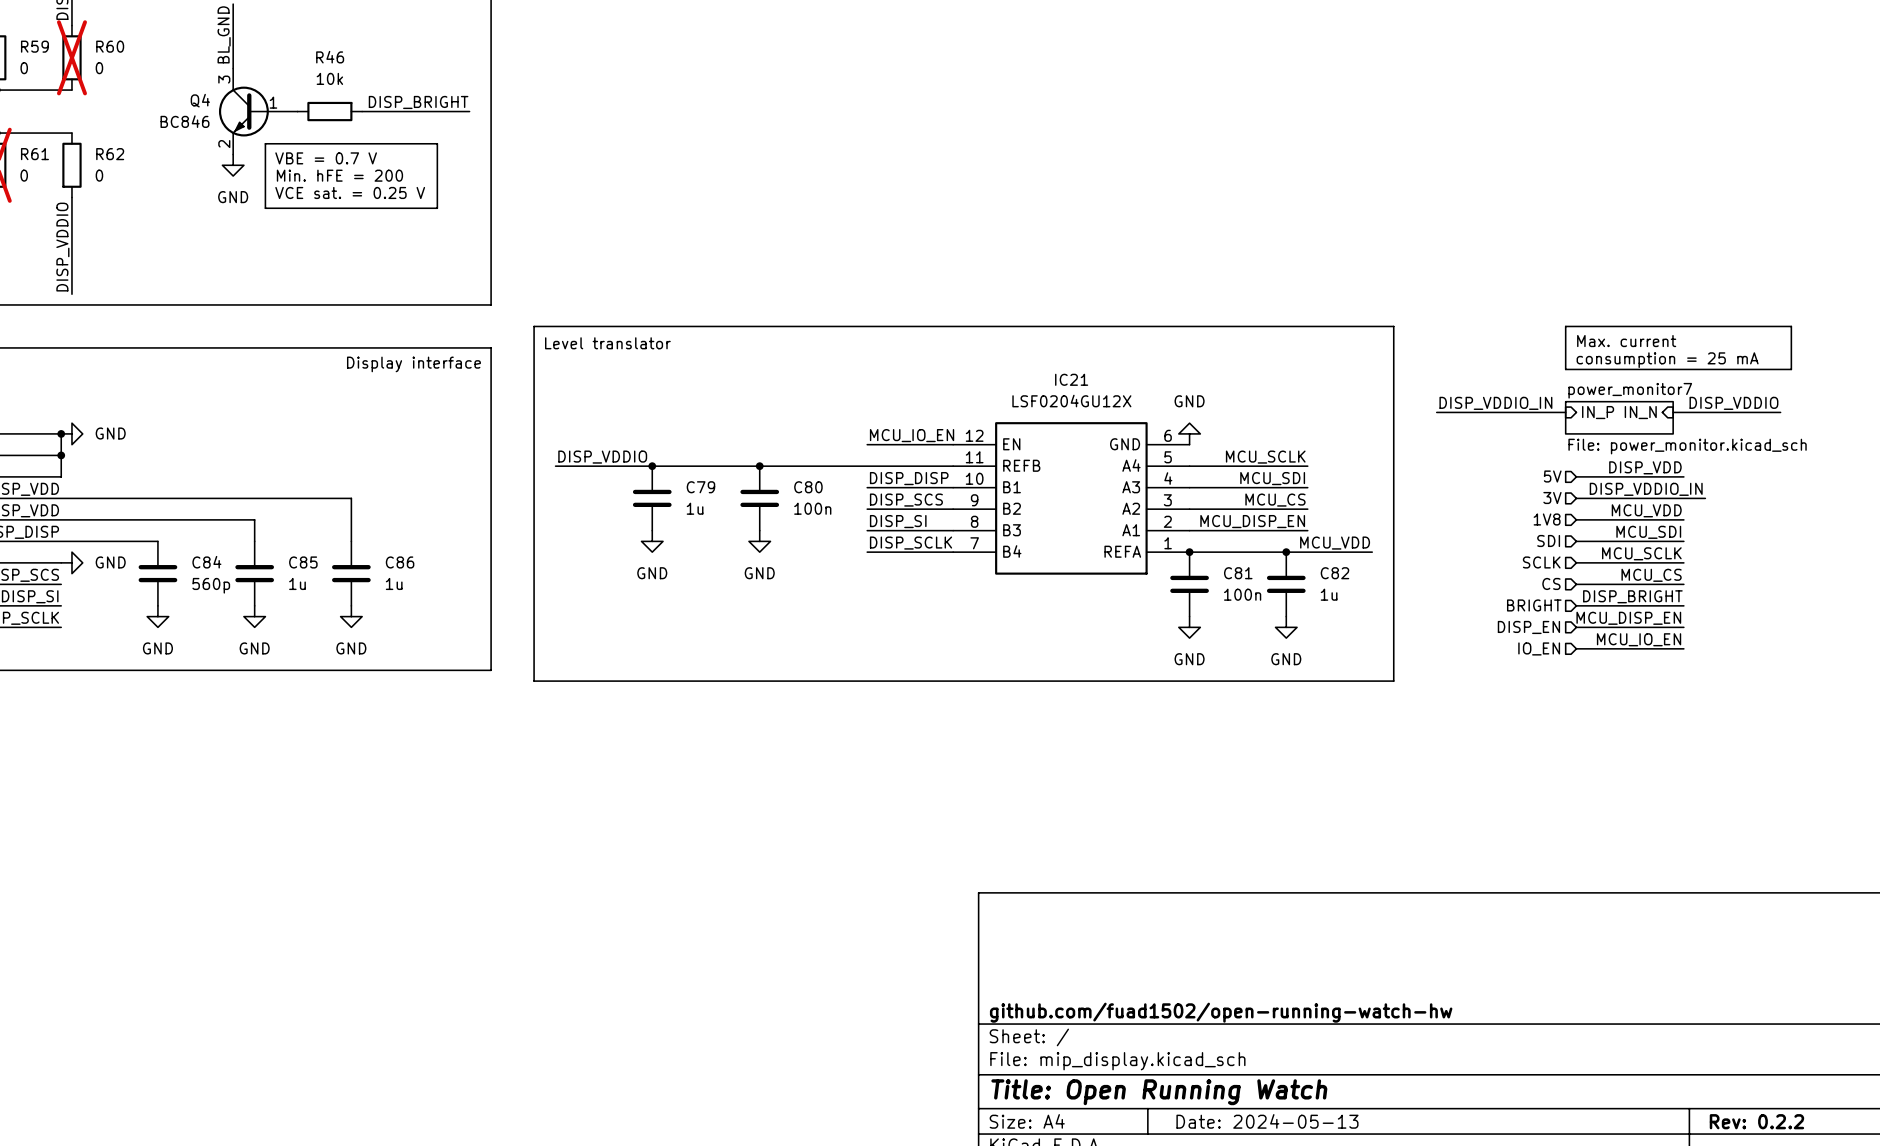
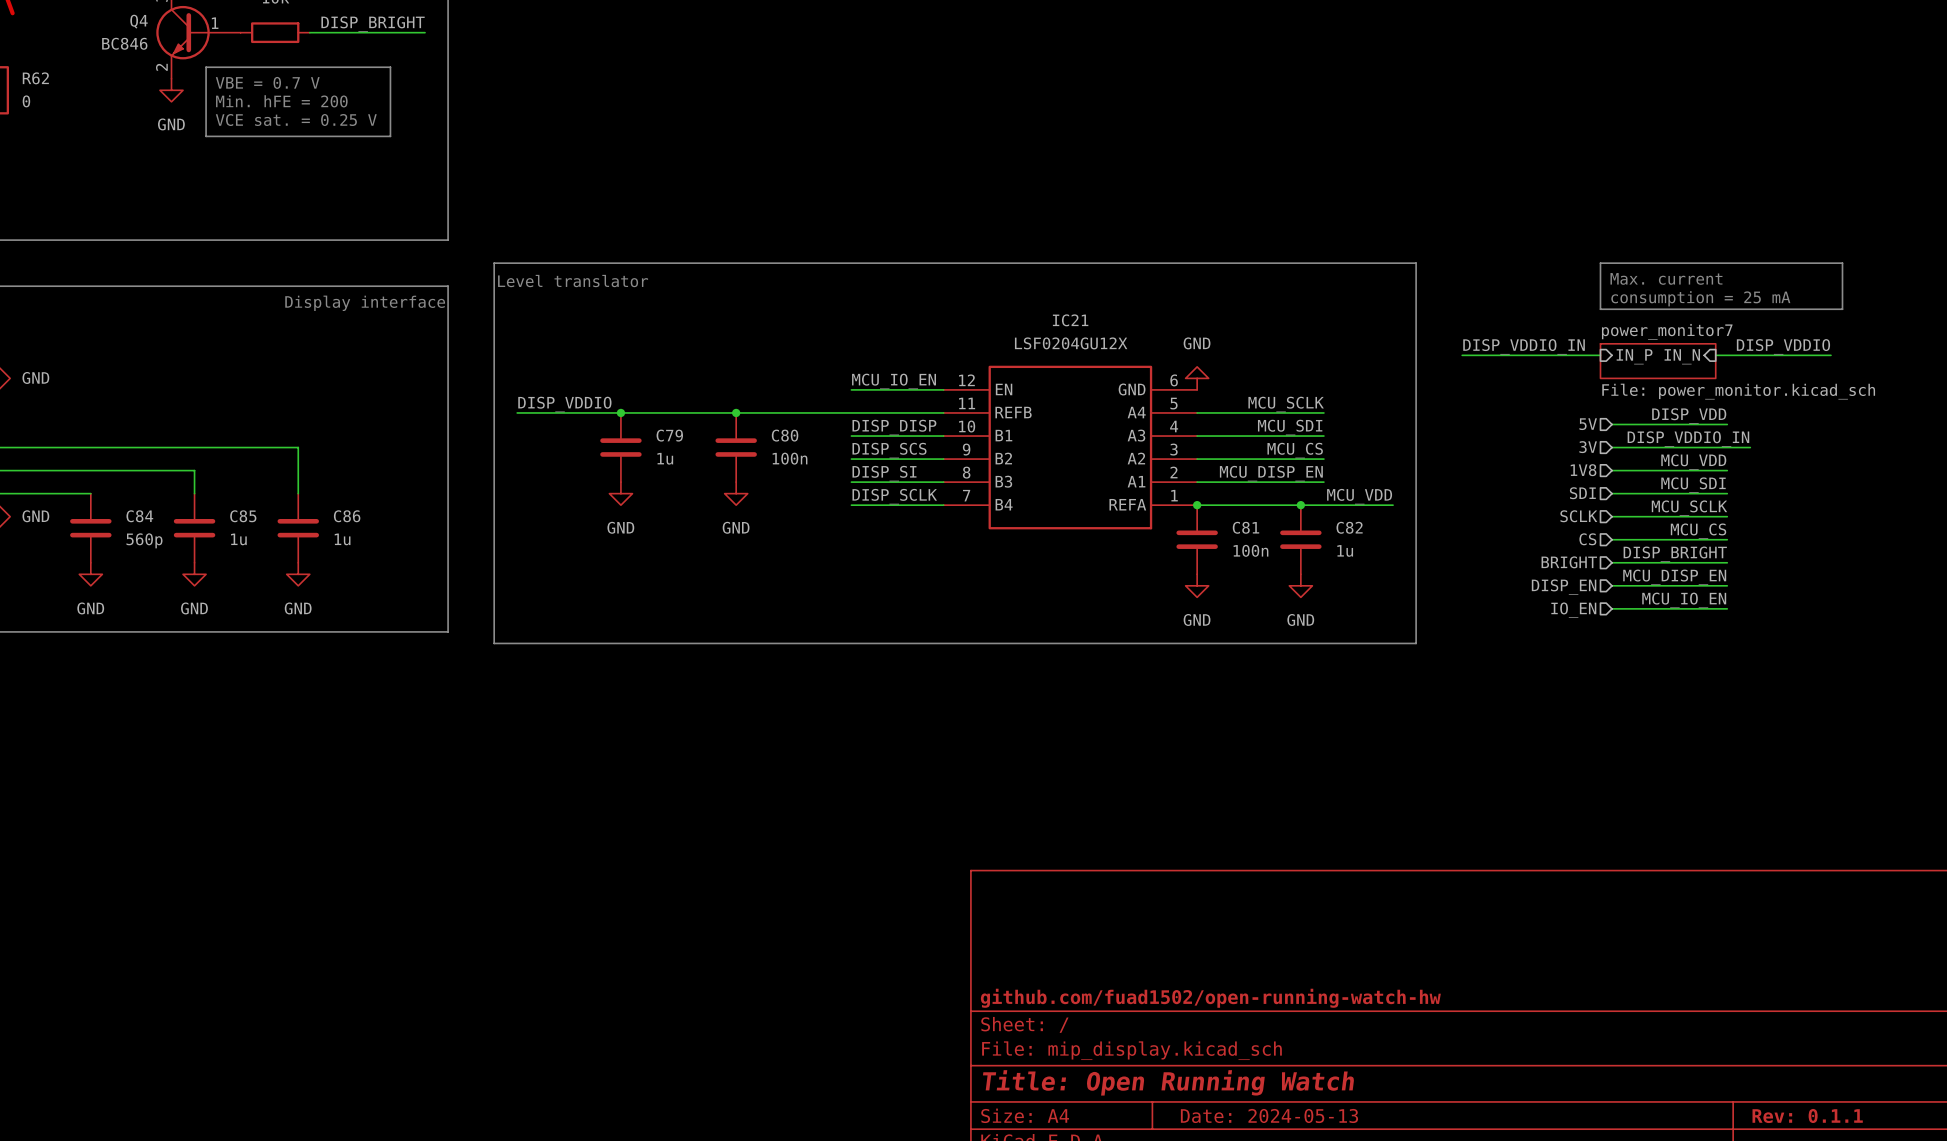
title block: Rev: 0.2.2 (1756, 1121) -> Rev: 0.1.1 (1807, 1115)

